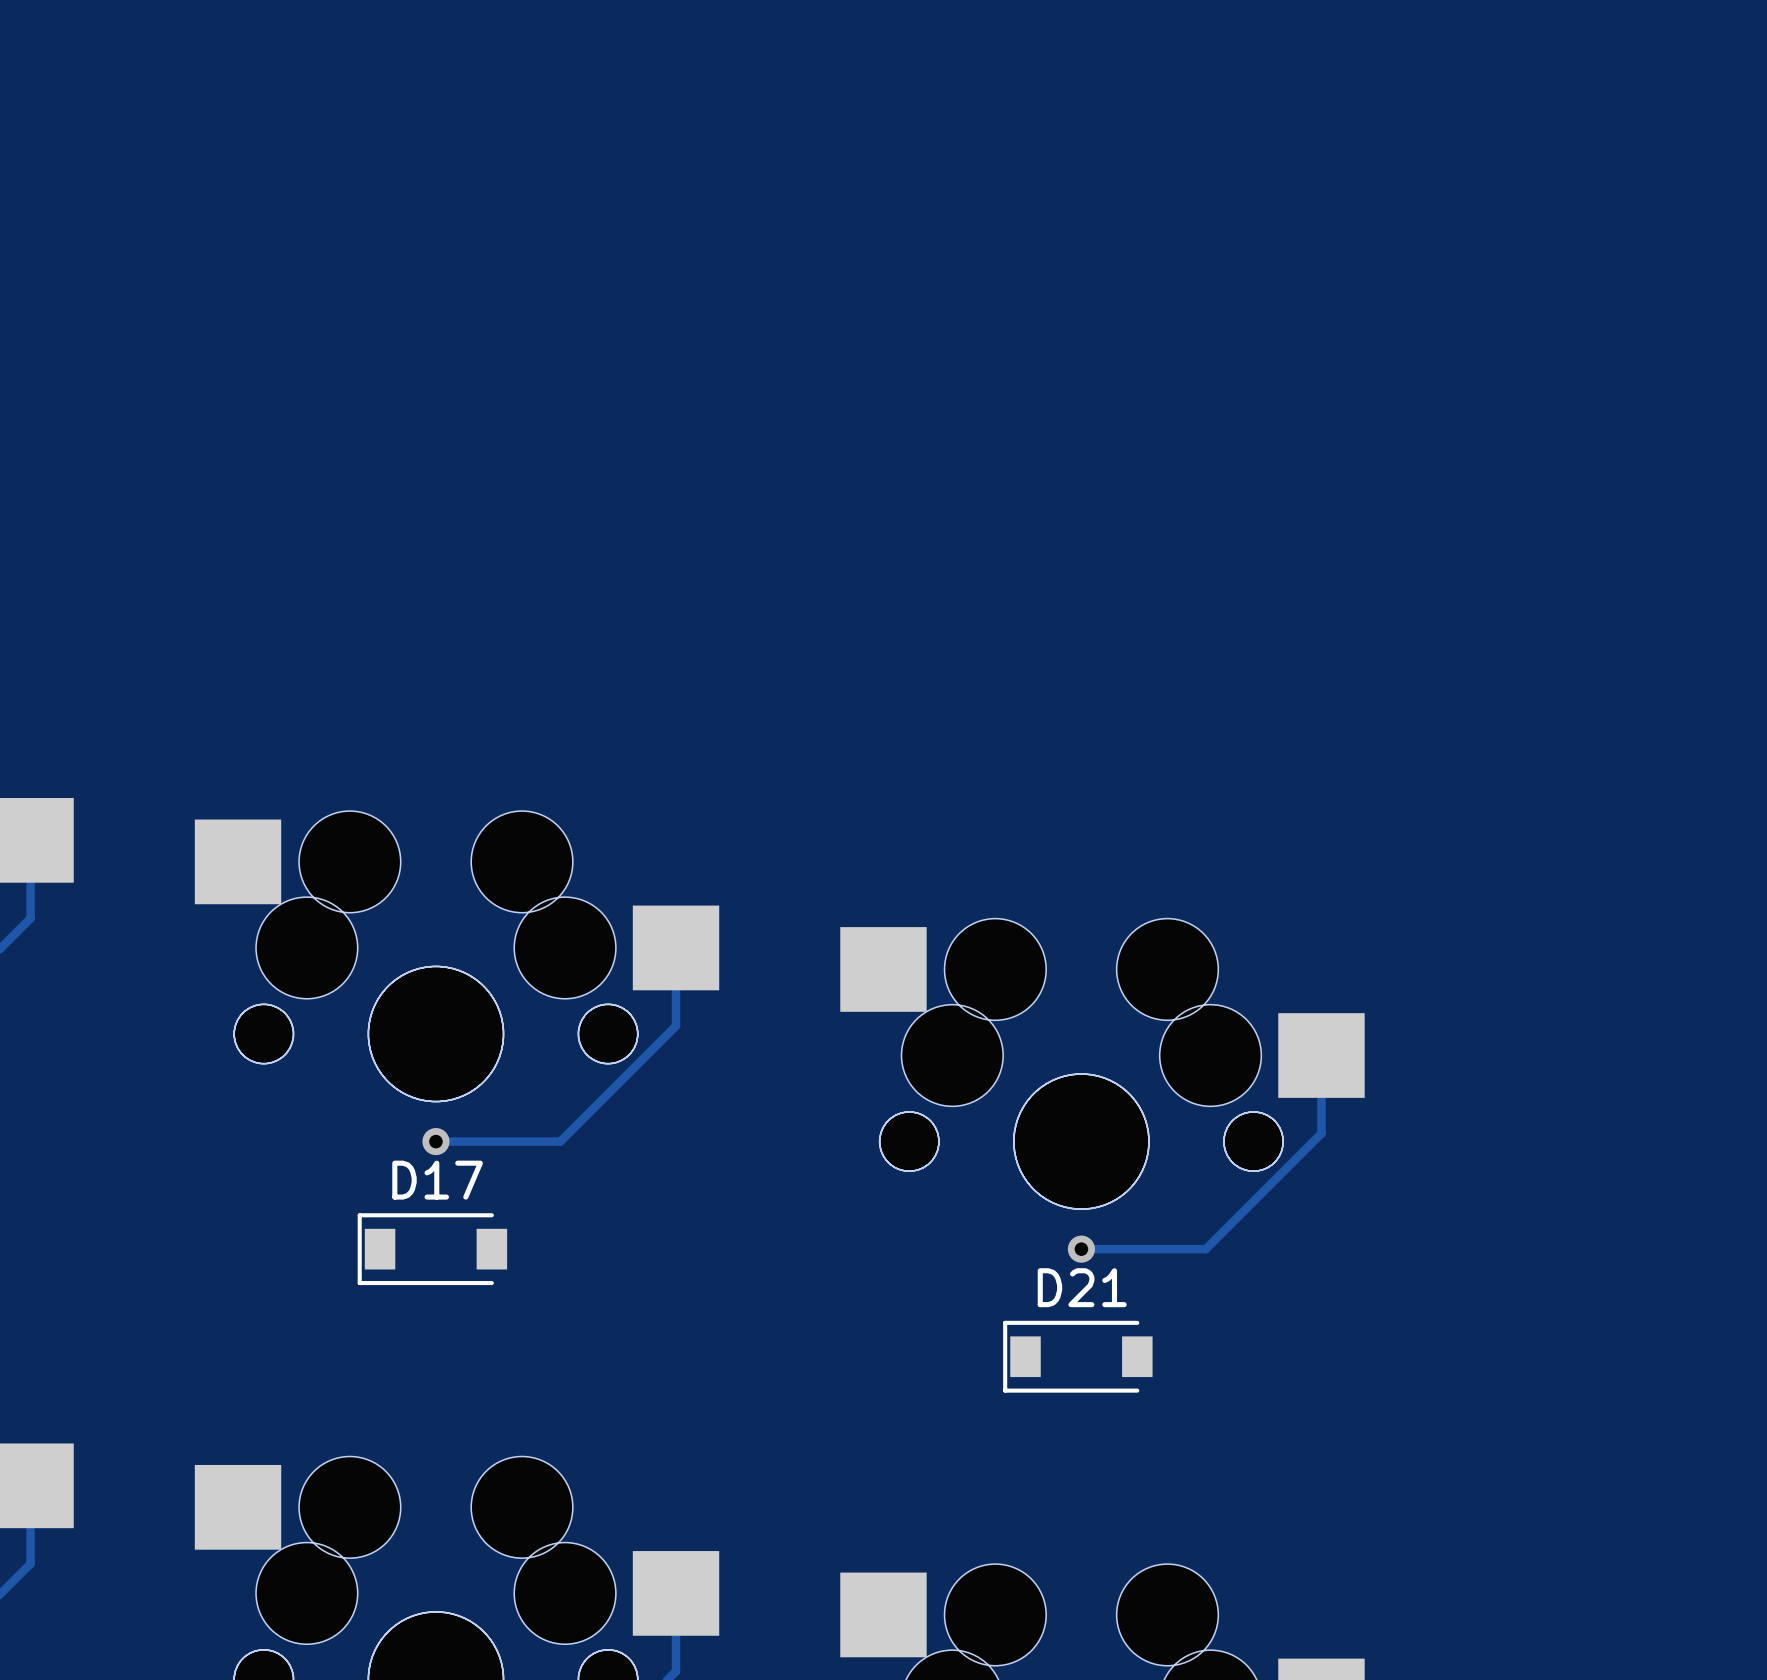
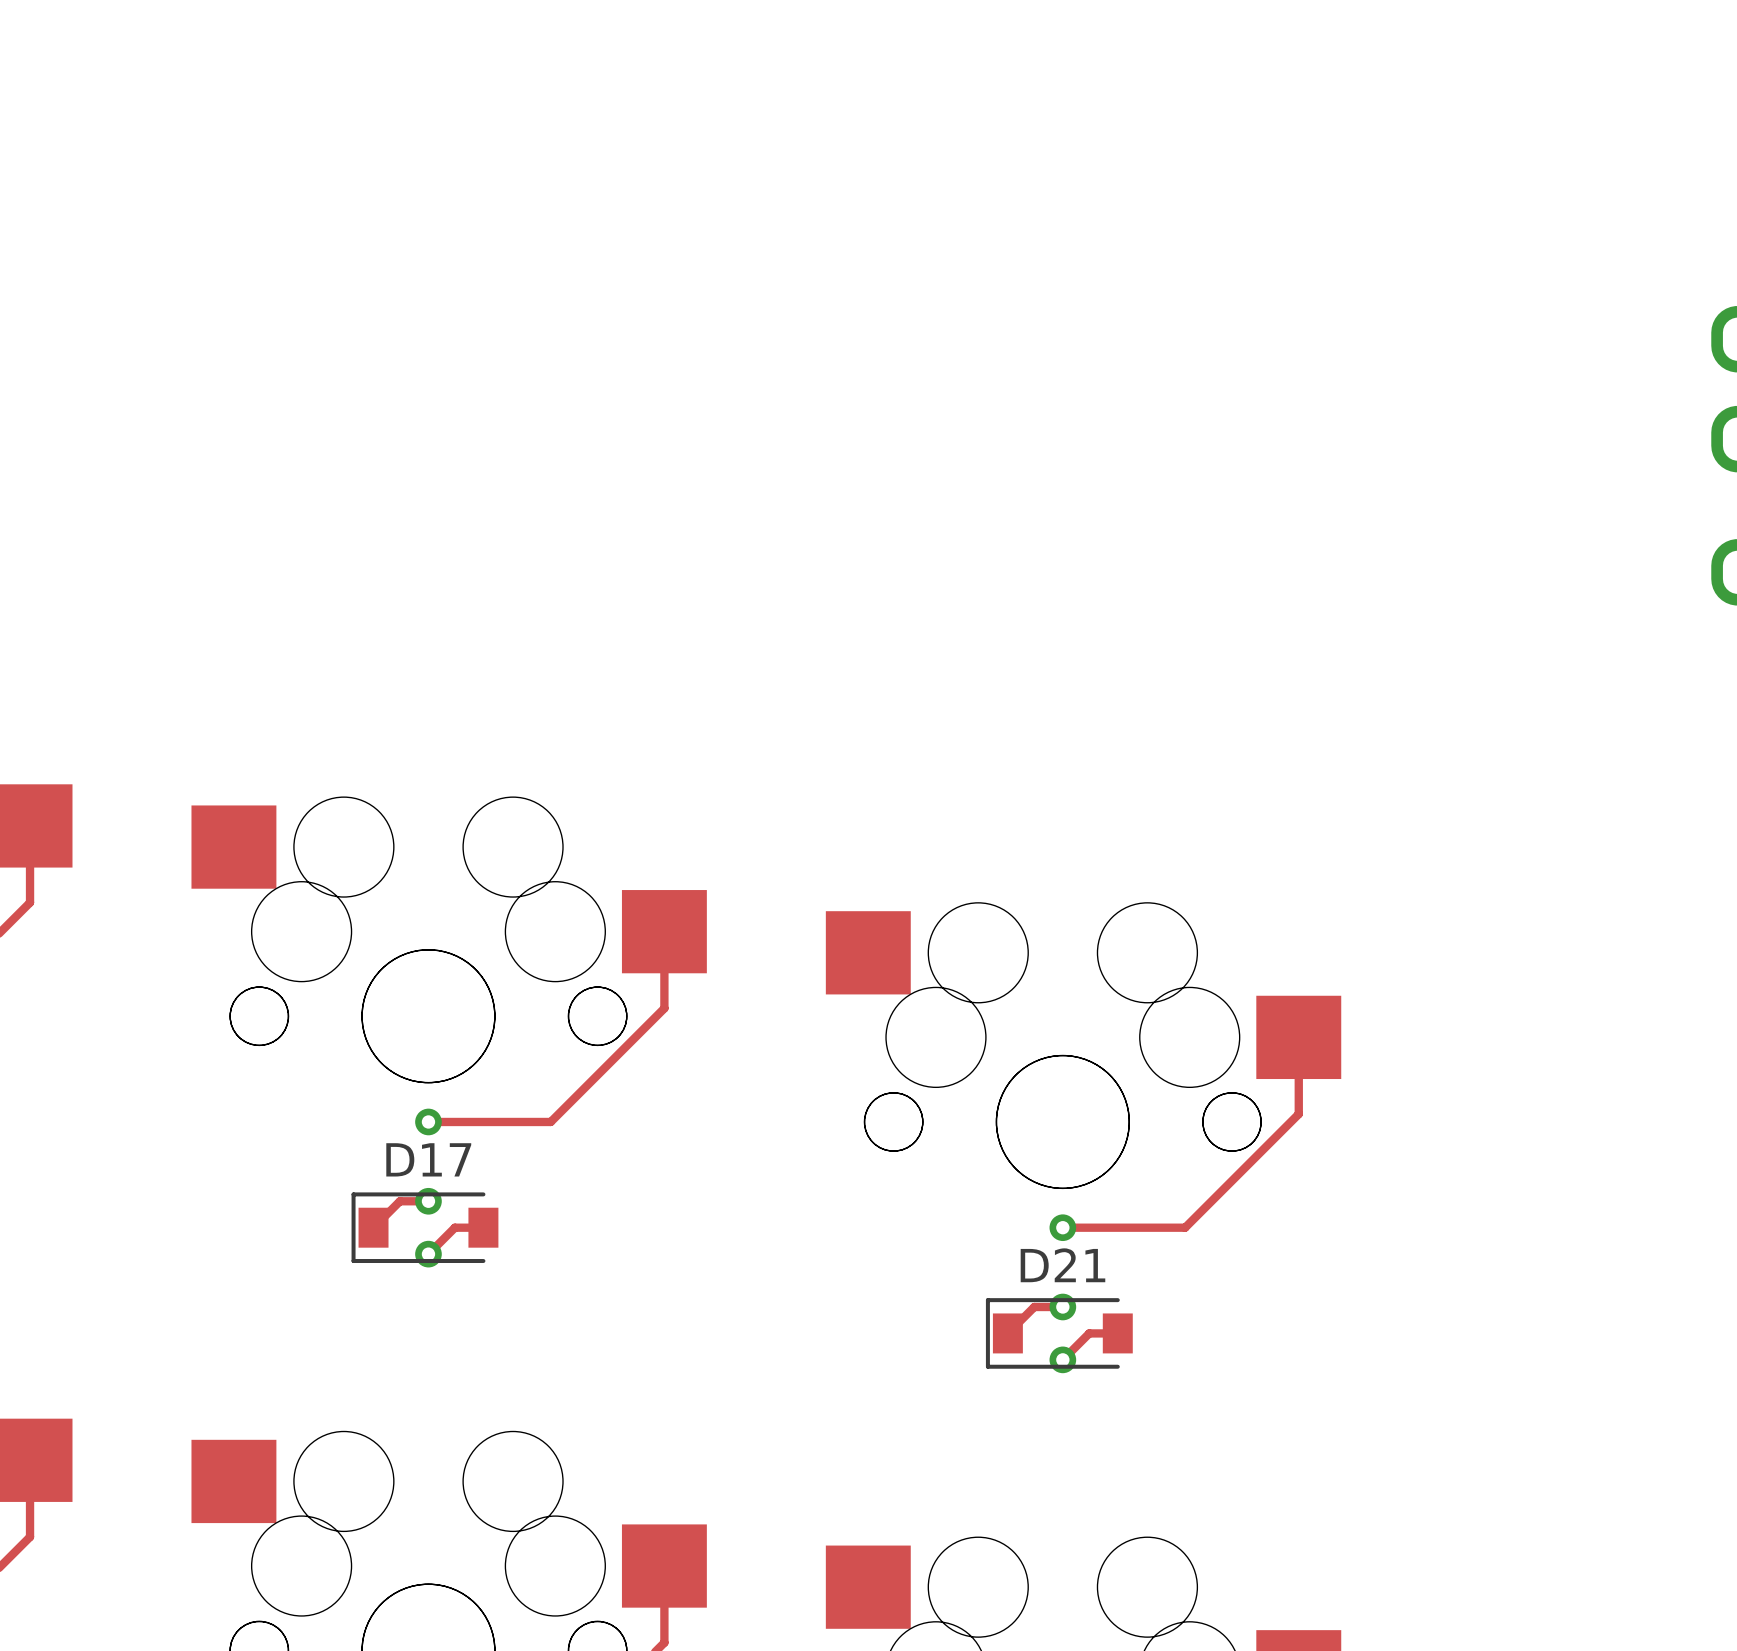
track: none -> (428, 1201) (399, 1201) (373, 1227)
via: none -> (428, 1201)
track: none -> (483, 1227) (454, 1227) (428, 1254)
via: none -> (428, 1254)
track: none -> (1062, 1307) (1034, 1307) (1007, 1333)
via: none -> (1062, 1307)
track: none -> (1117, 1333) (1089, 1333) (1062, 1359)
via: none -> (1062, 1359)

